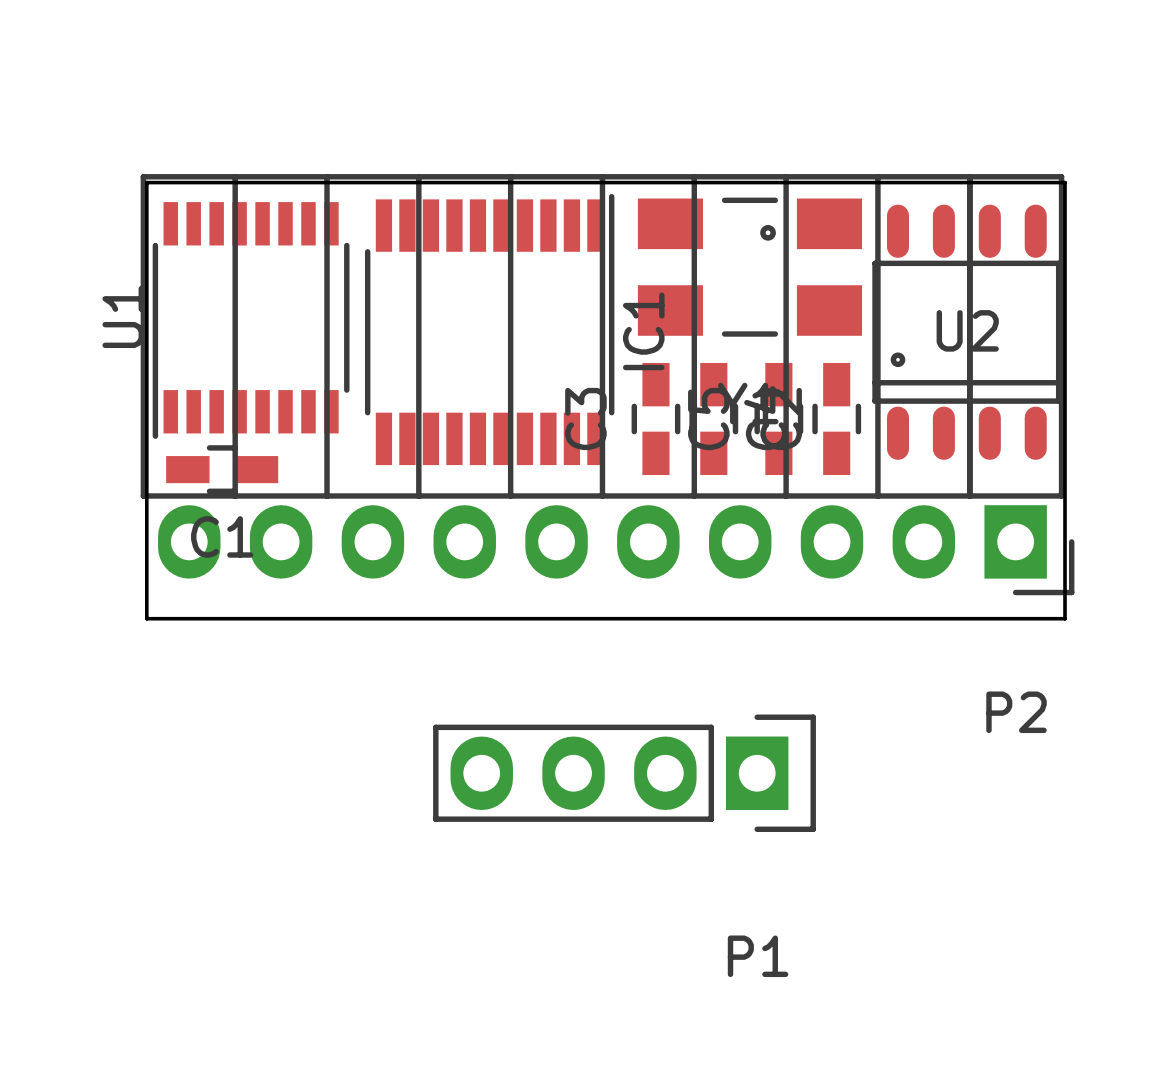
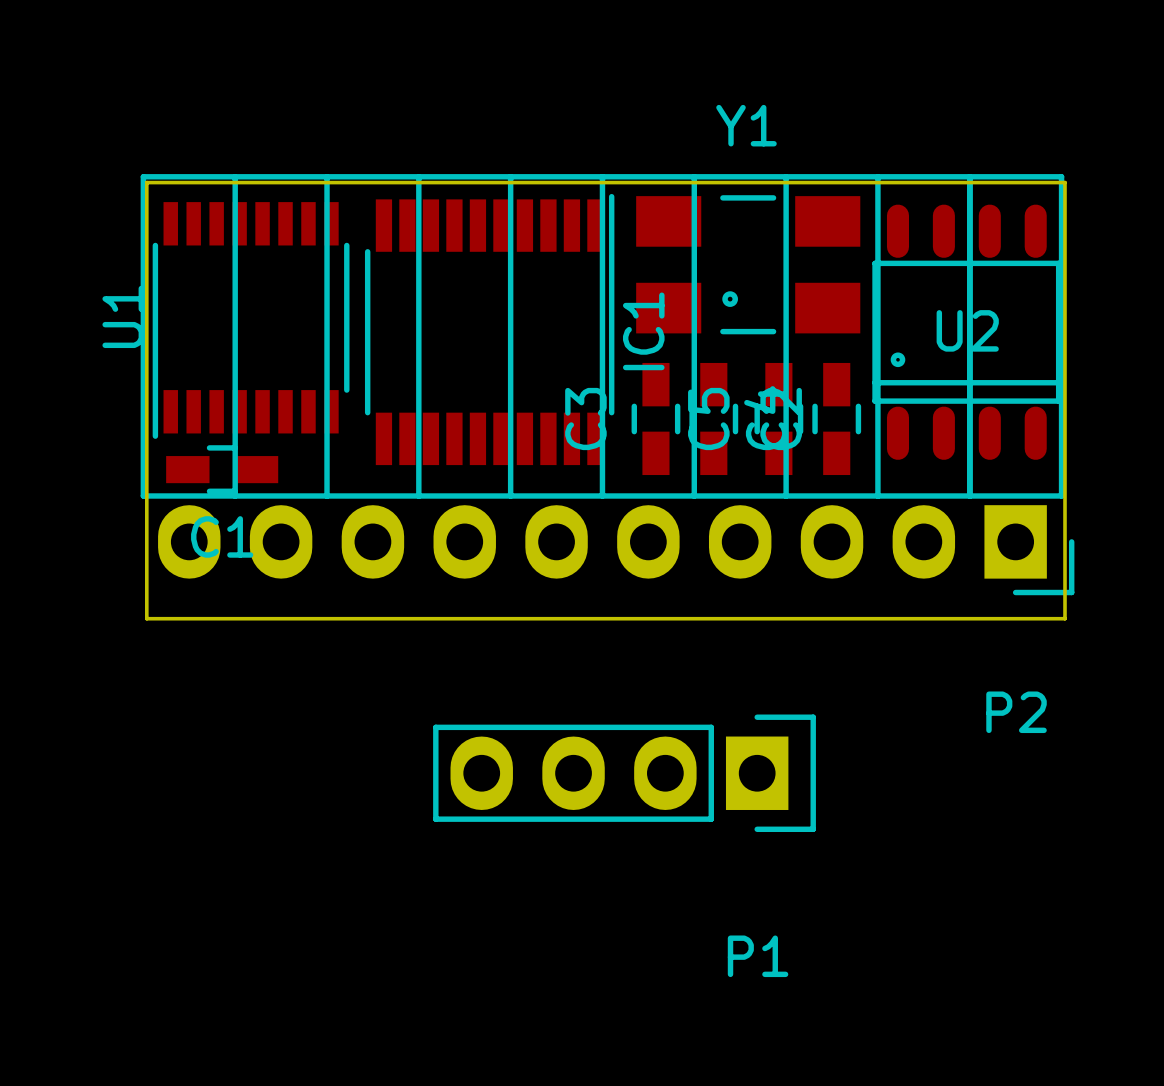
Y1 rotation: 0° (749, 267) -> 180° (748, 264)

